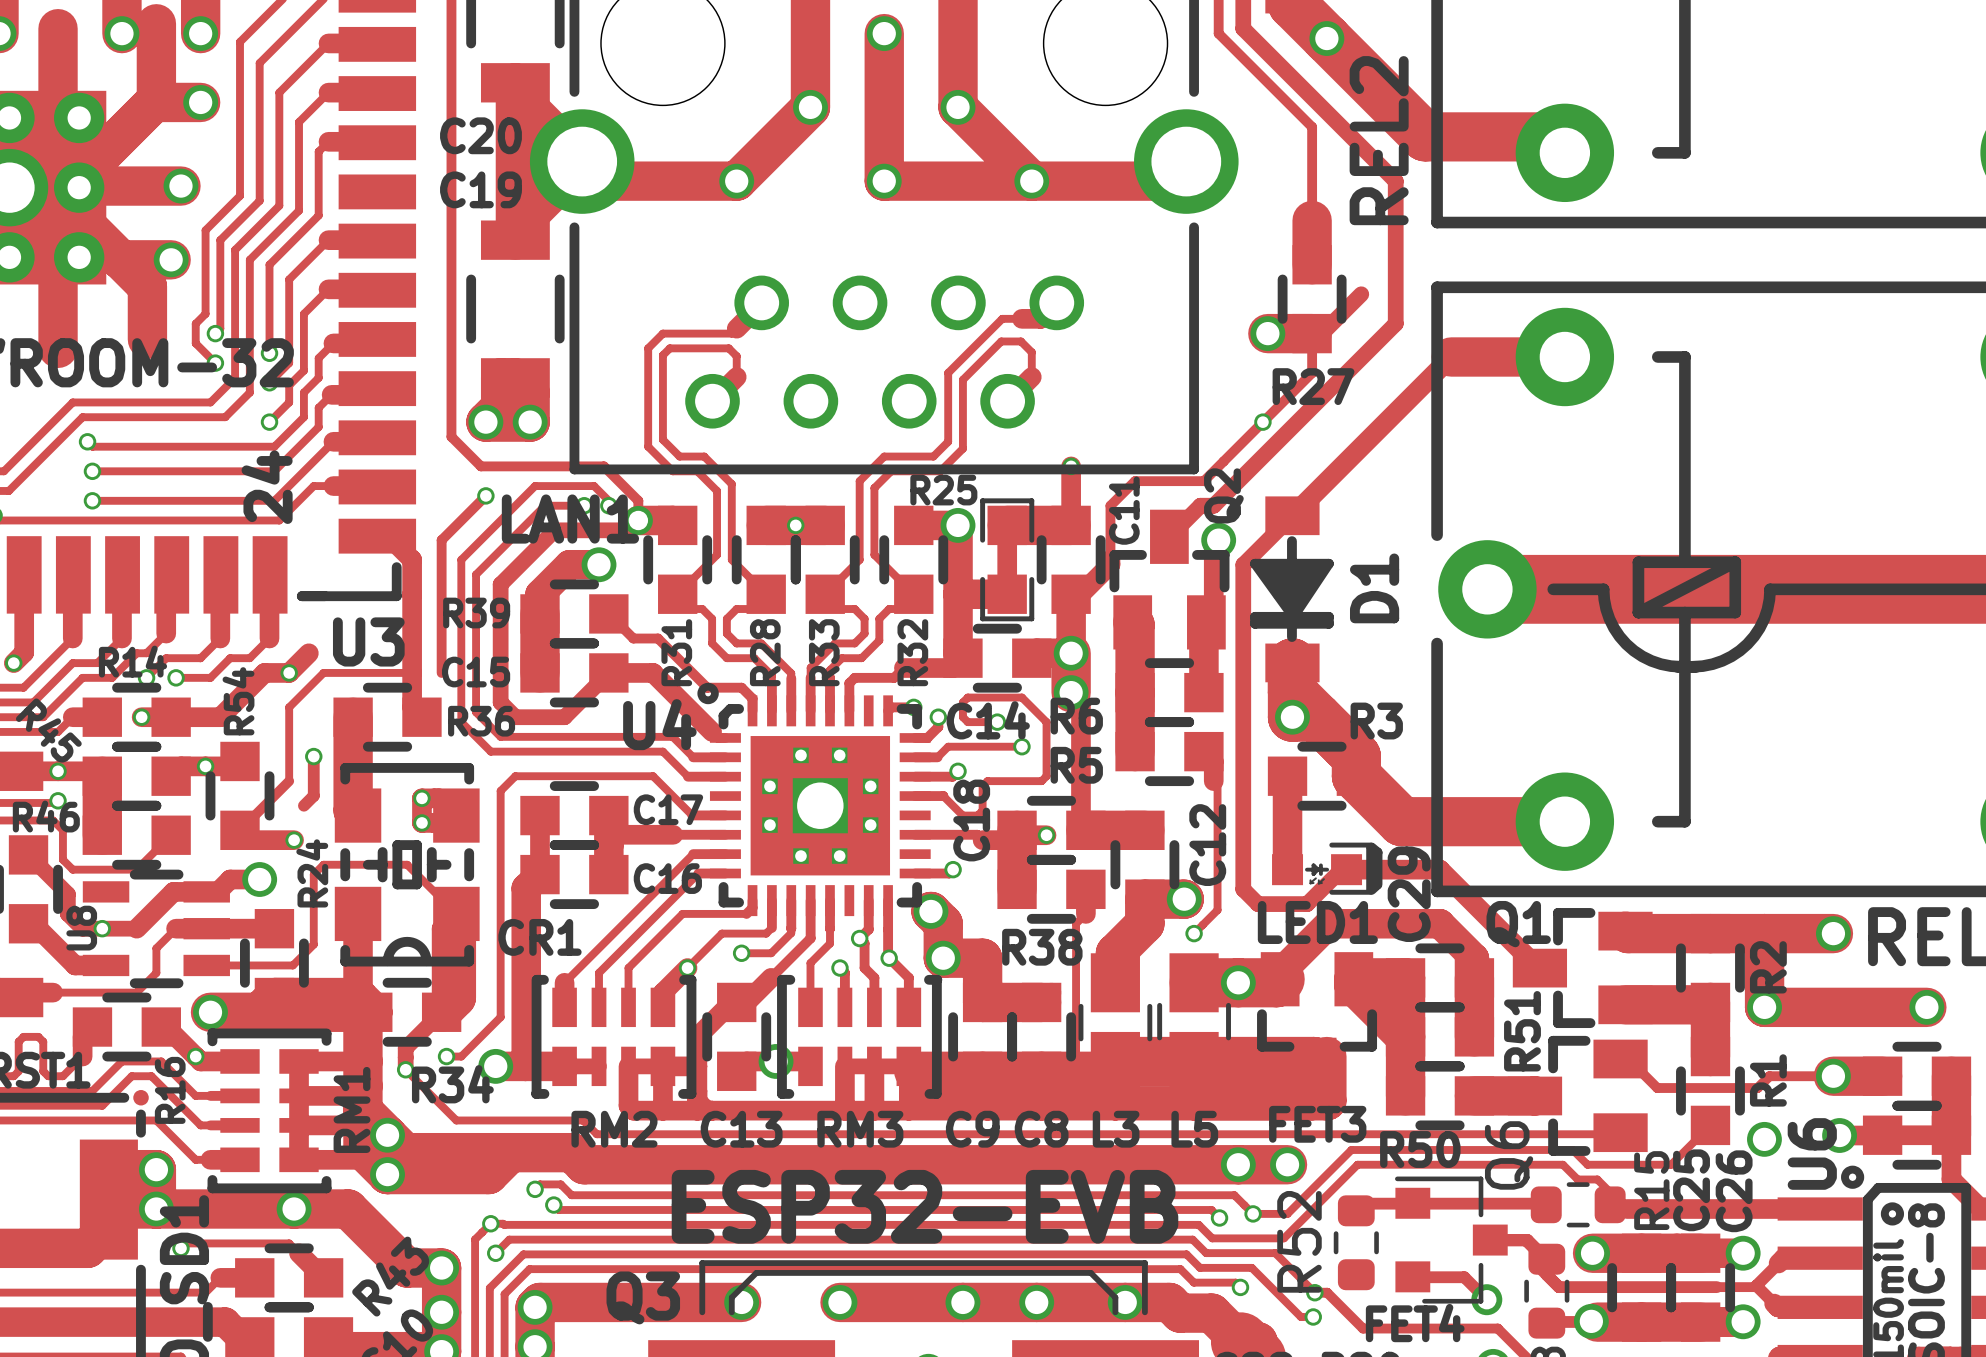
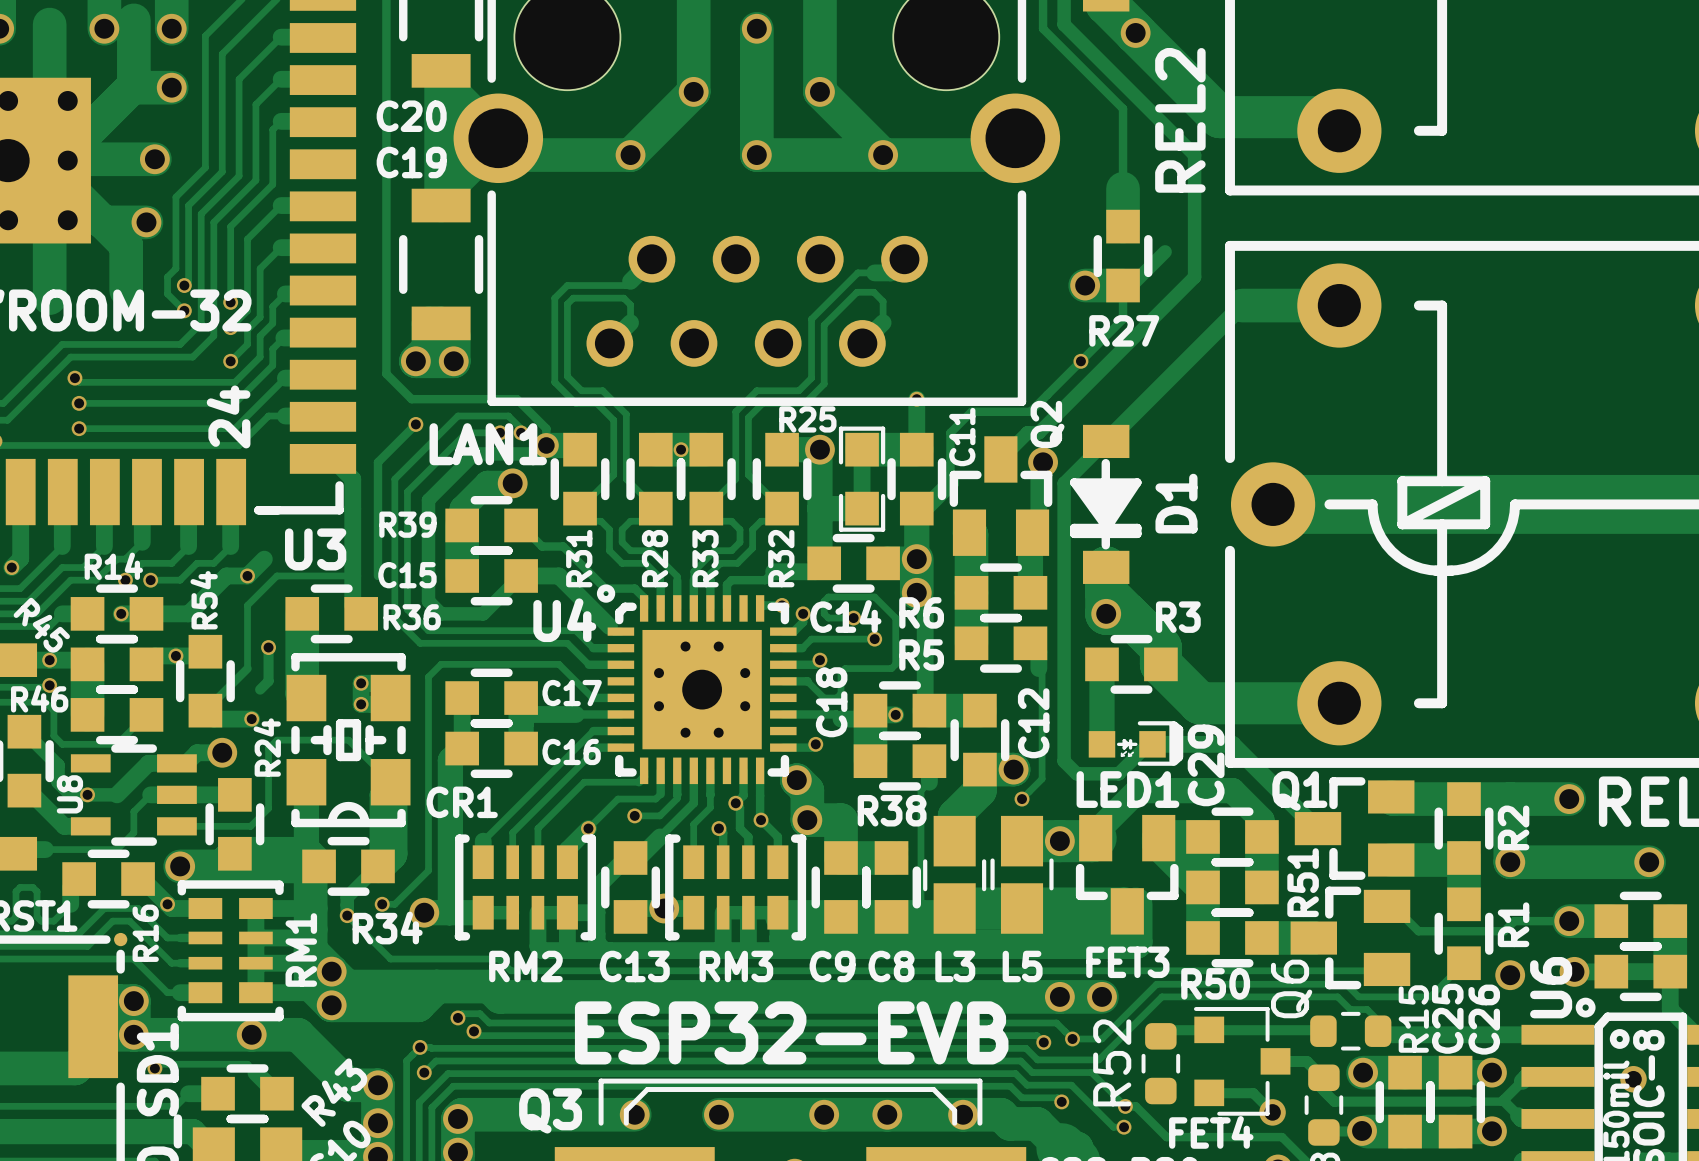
via: none -> (1633, 1079)

